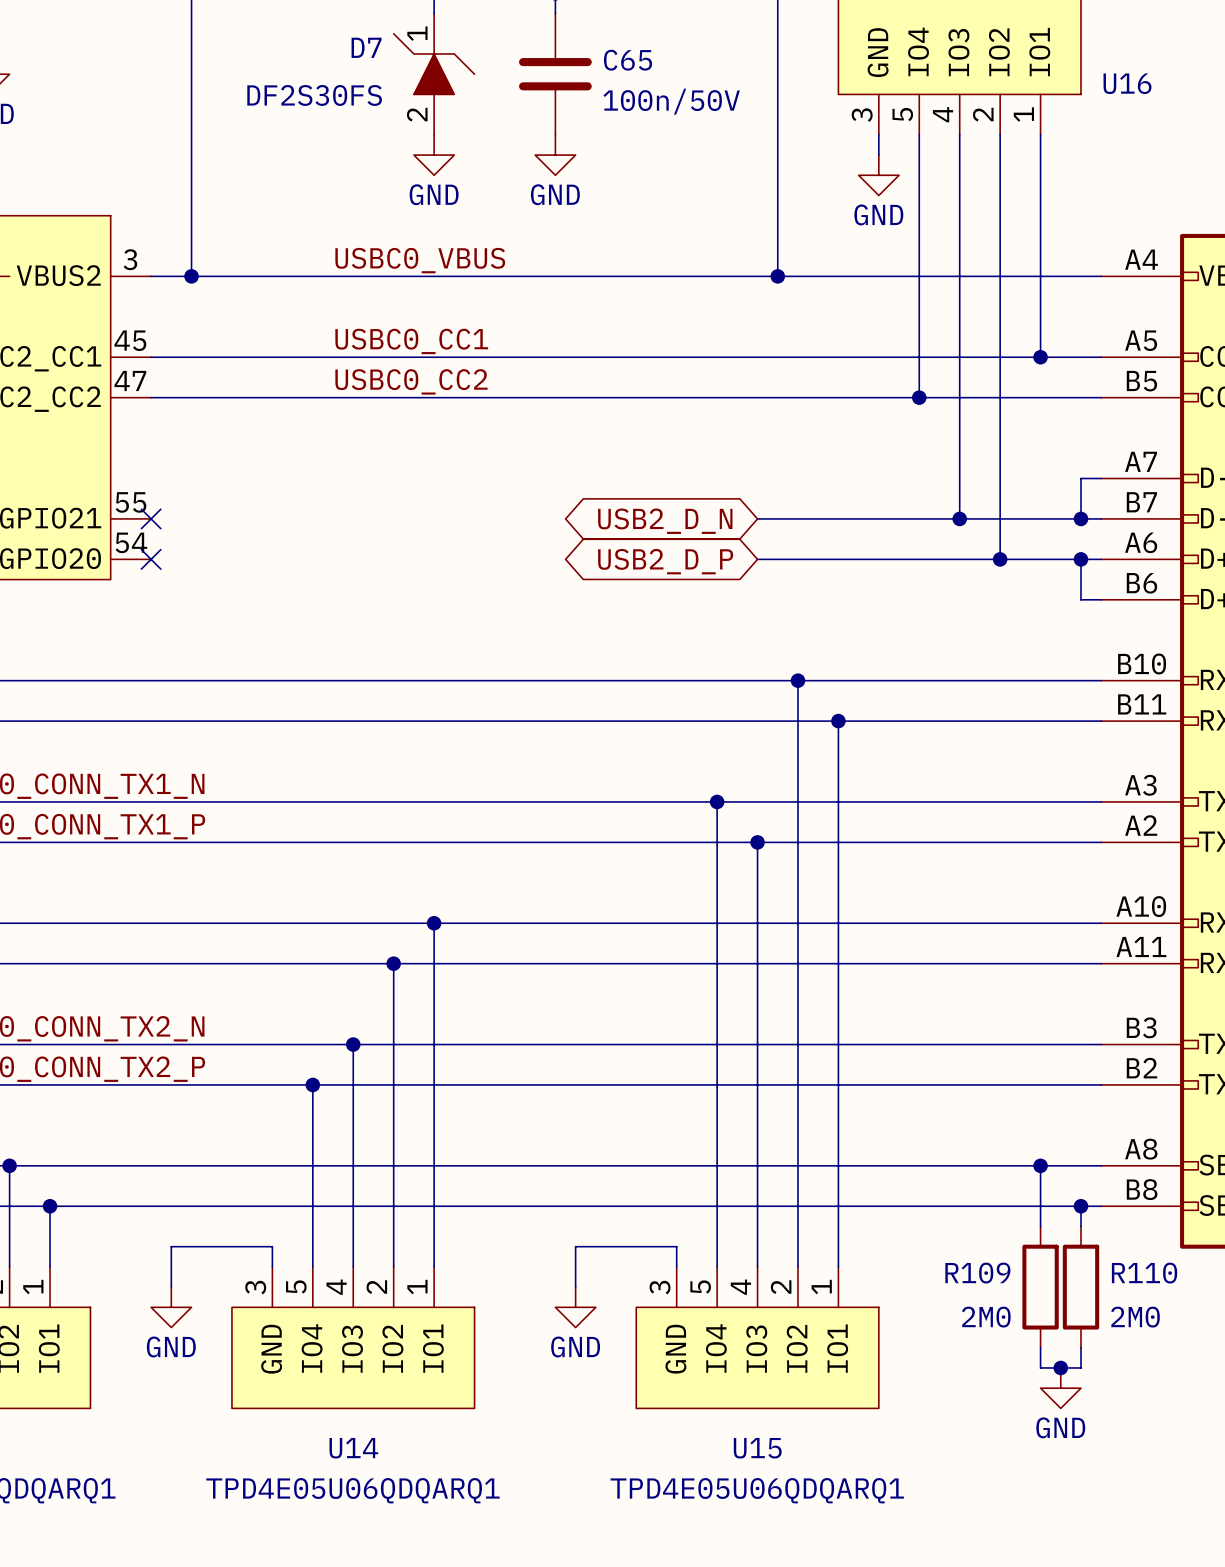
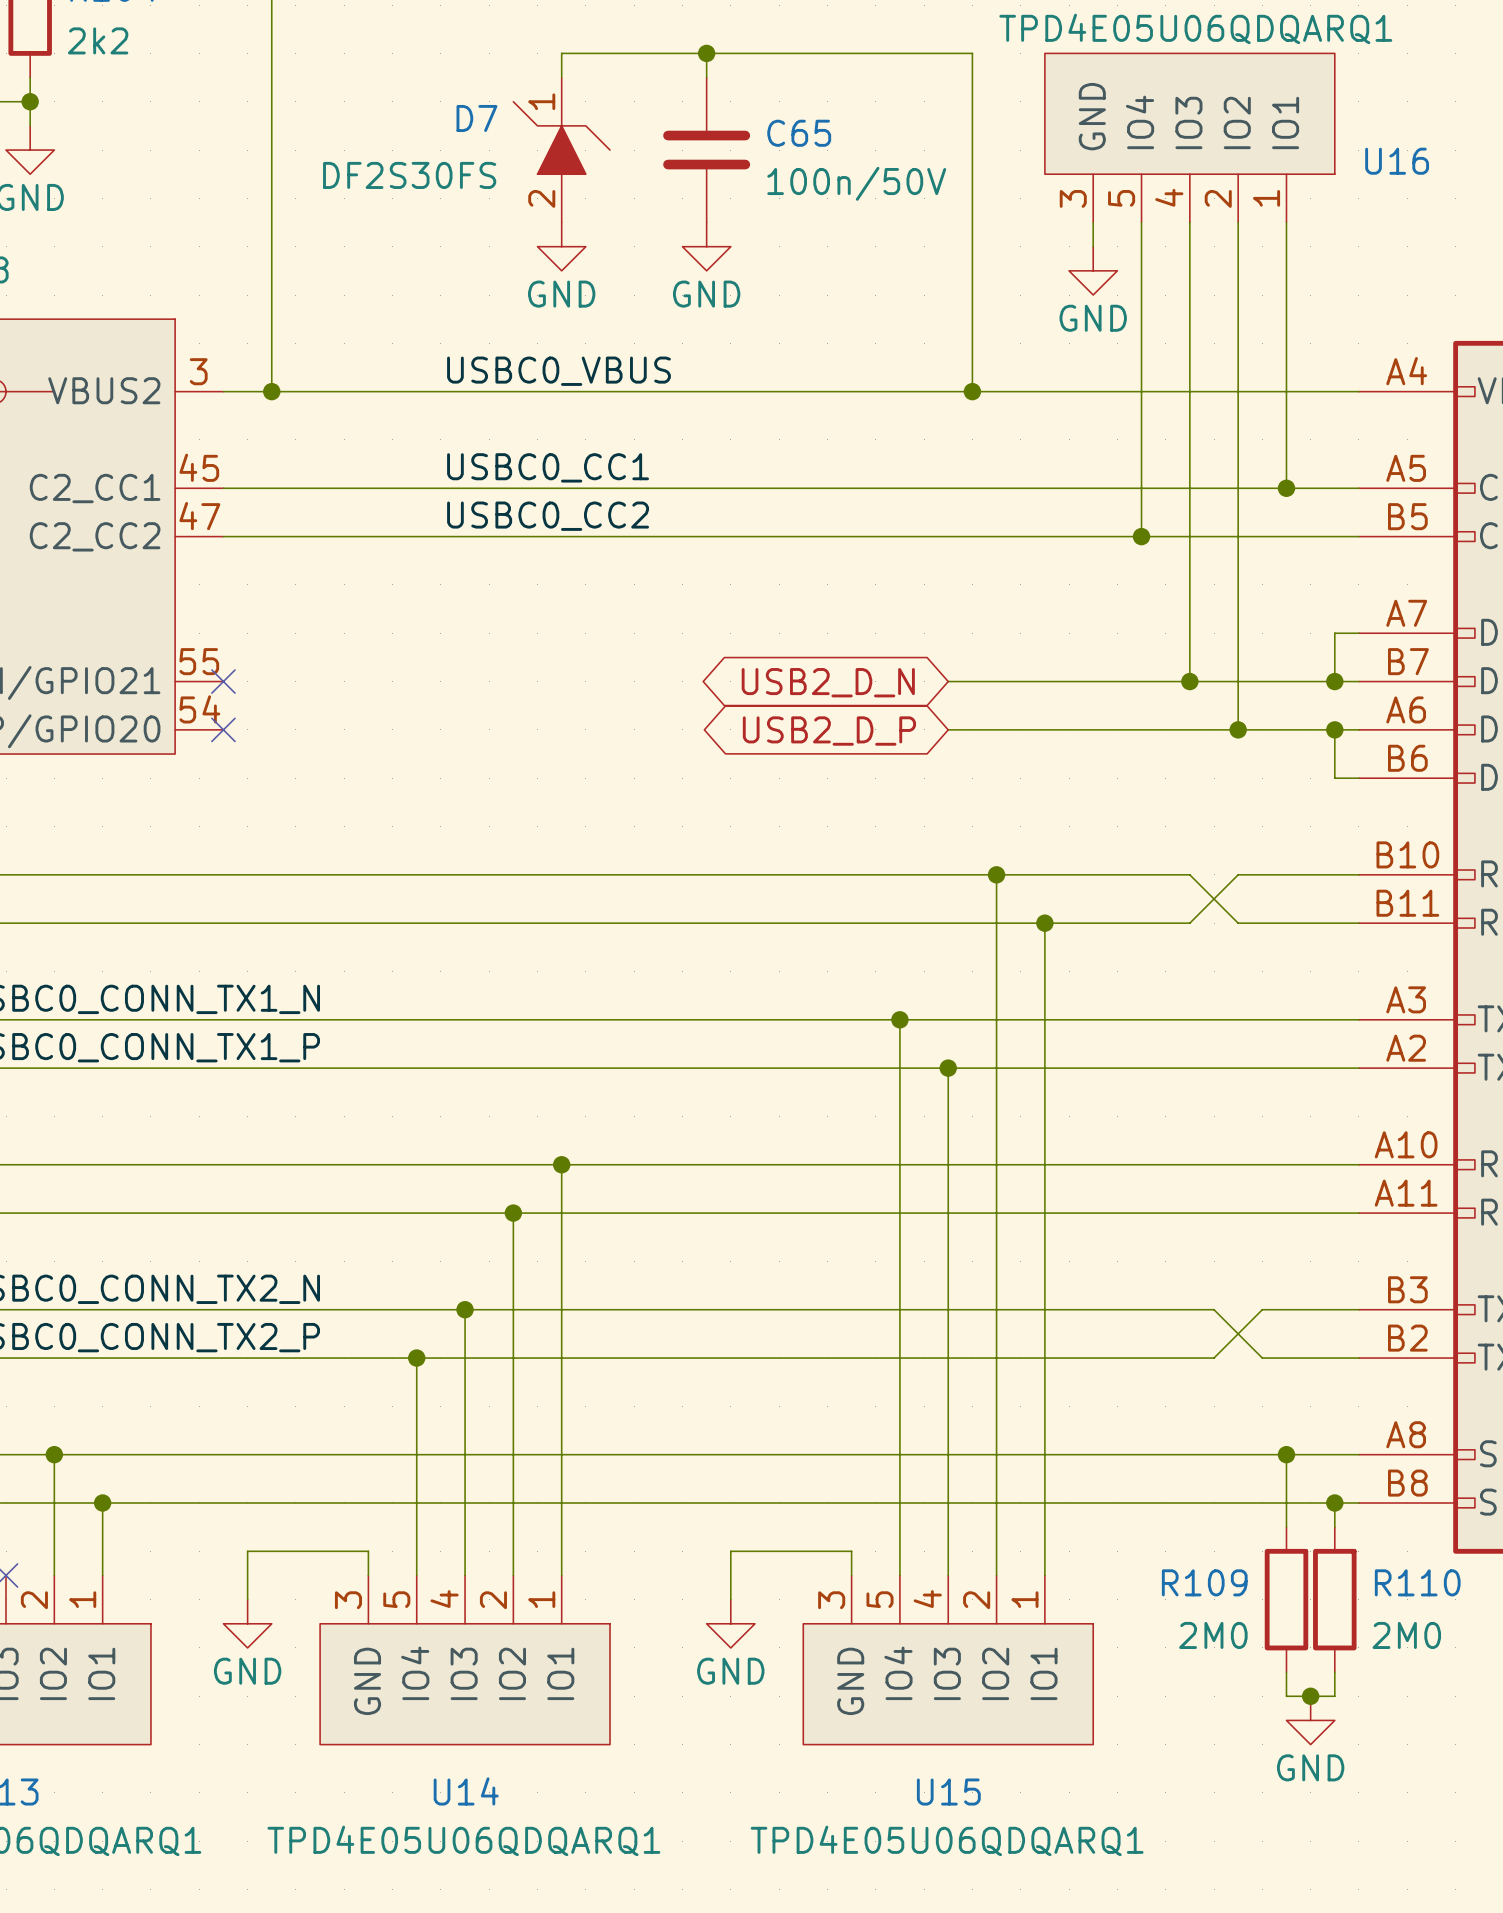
wire: (959, 680) (1000, 680) -> (1189, 874) (1238, 923)
wire: (959, 721) (1000, 721) -> (1189, 923) (1238, 874)
wire: (979, 1044) (1020, 1044) -> (1214, 1309) (1262, 1358)
wire: (979, 1084) (1020, 1084) -> (1214, 1358) (1262, 1309)

